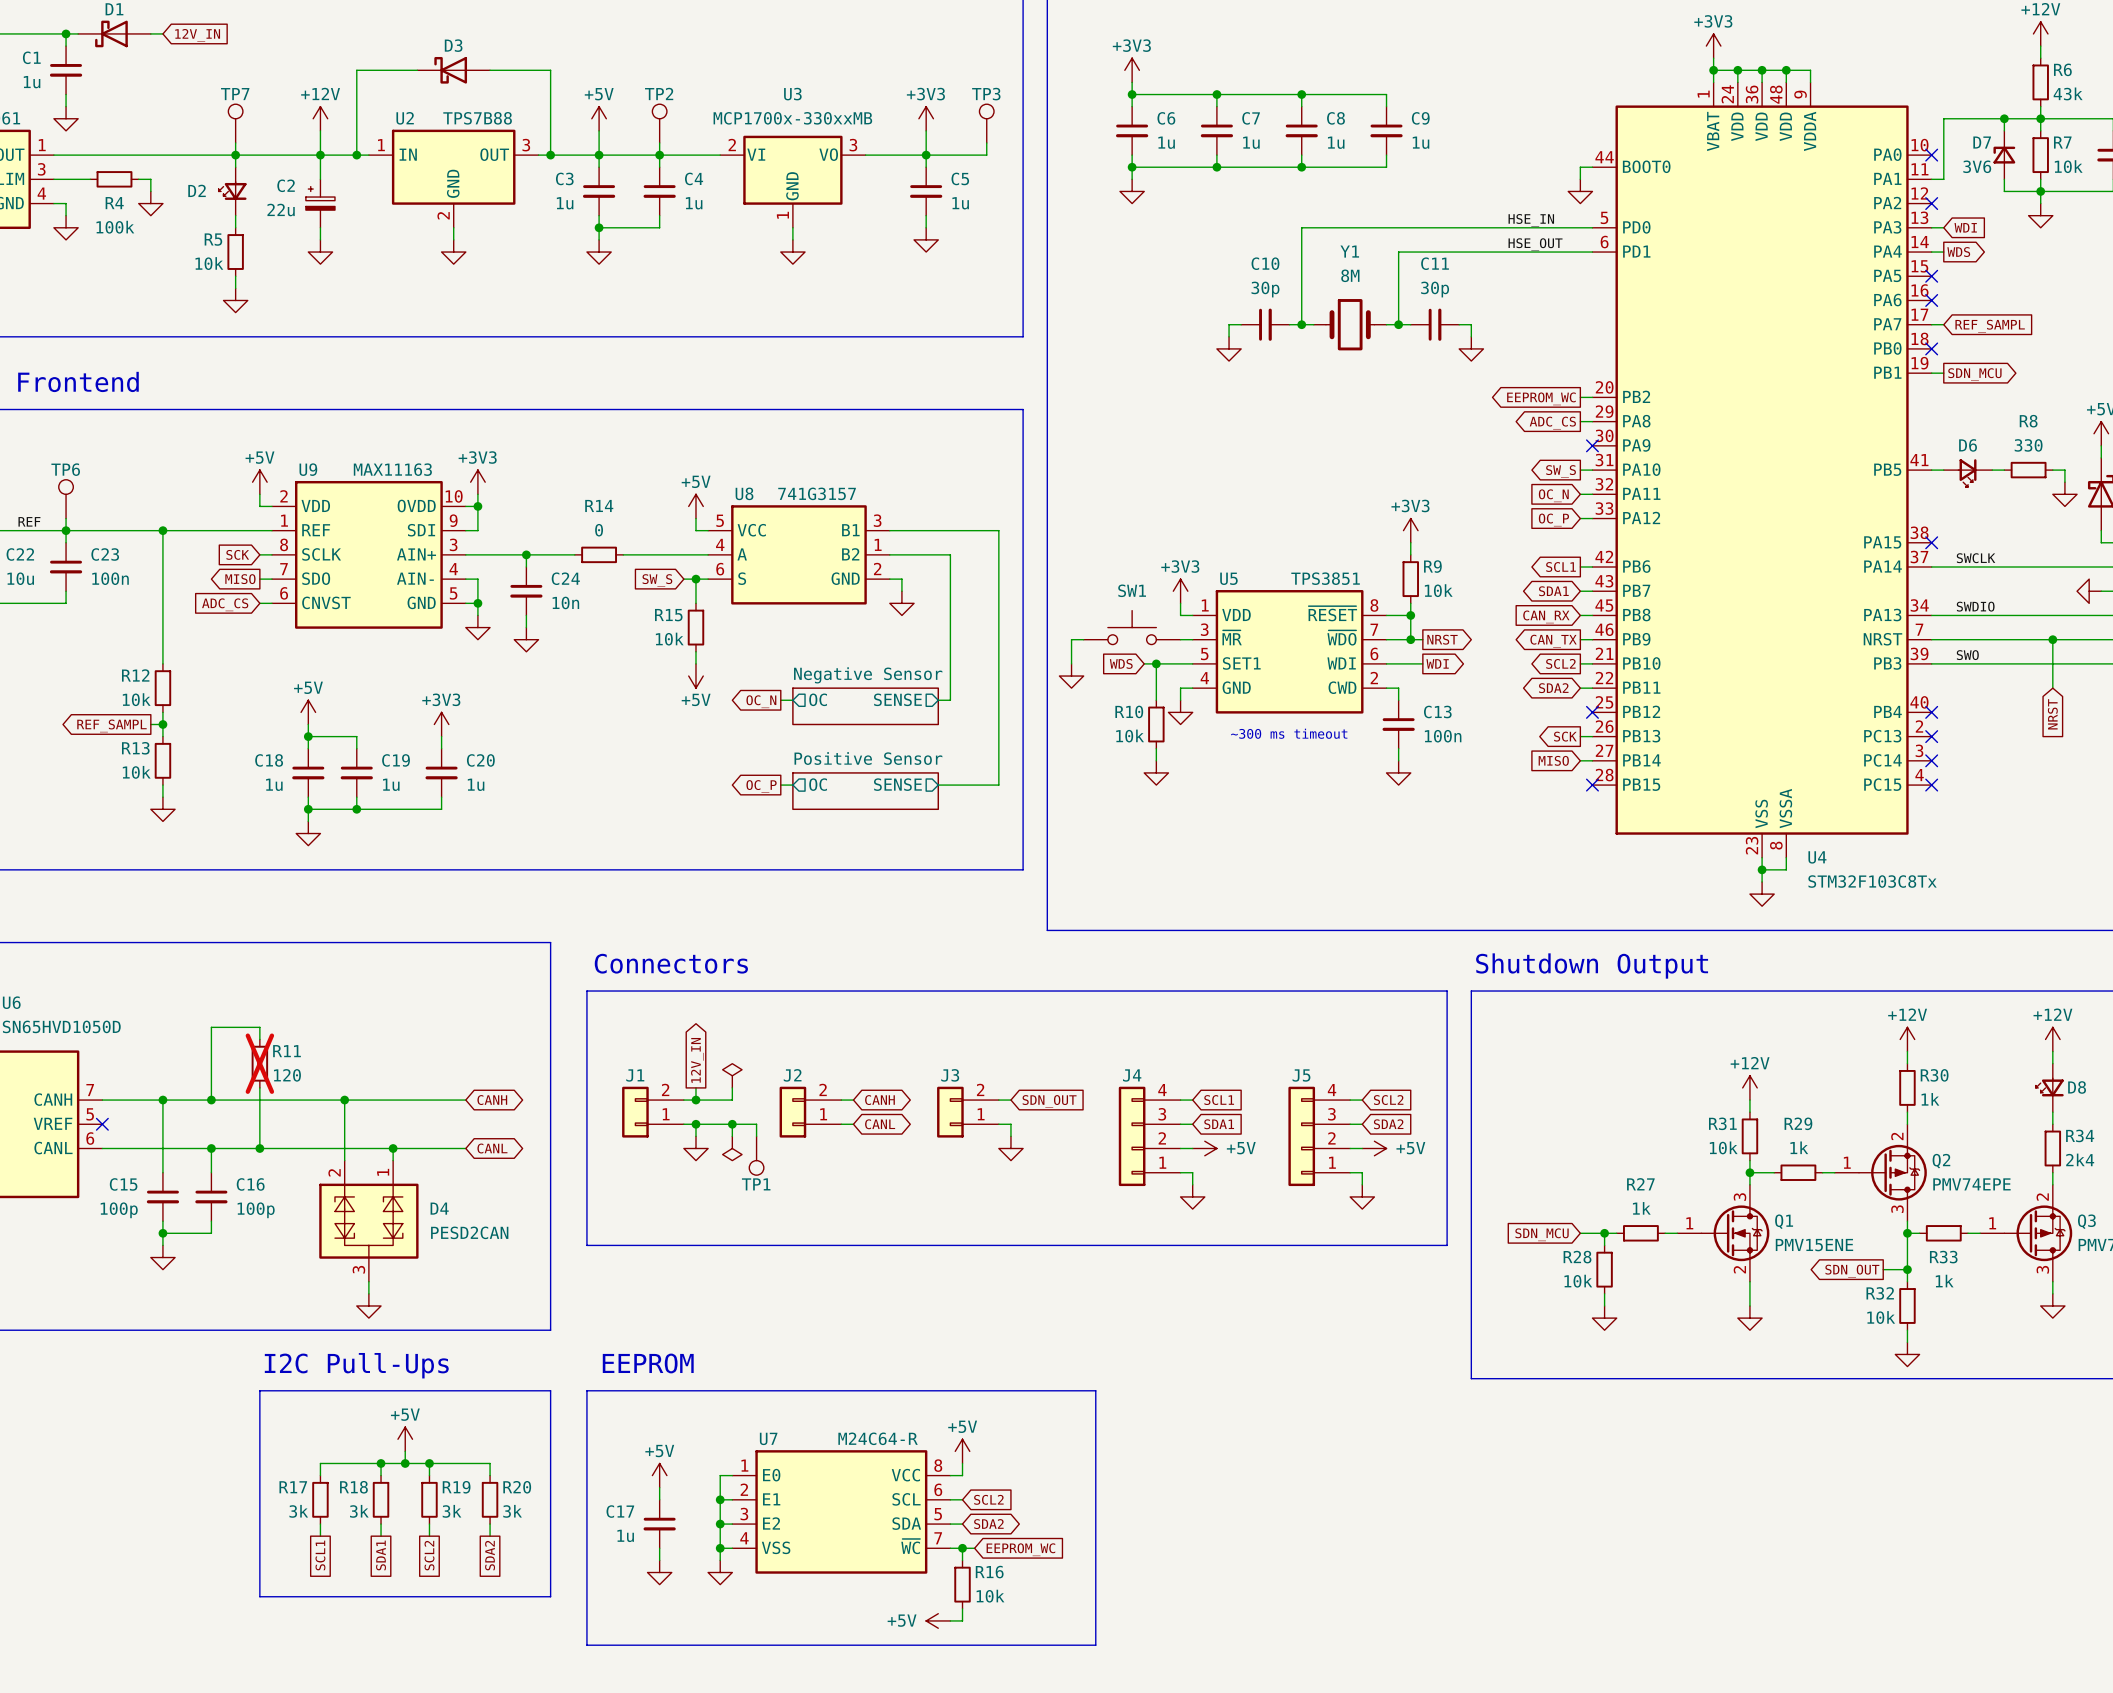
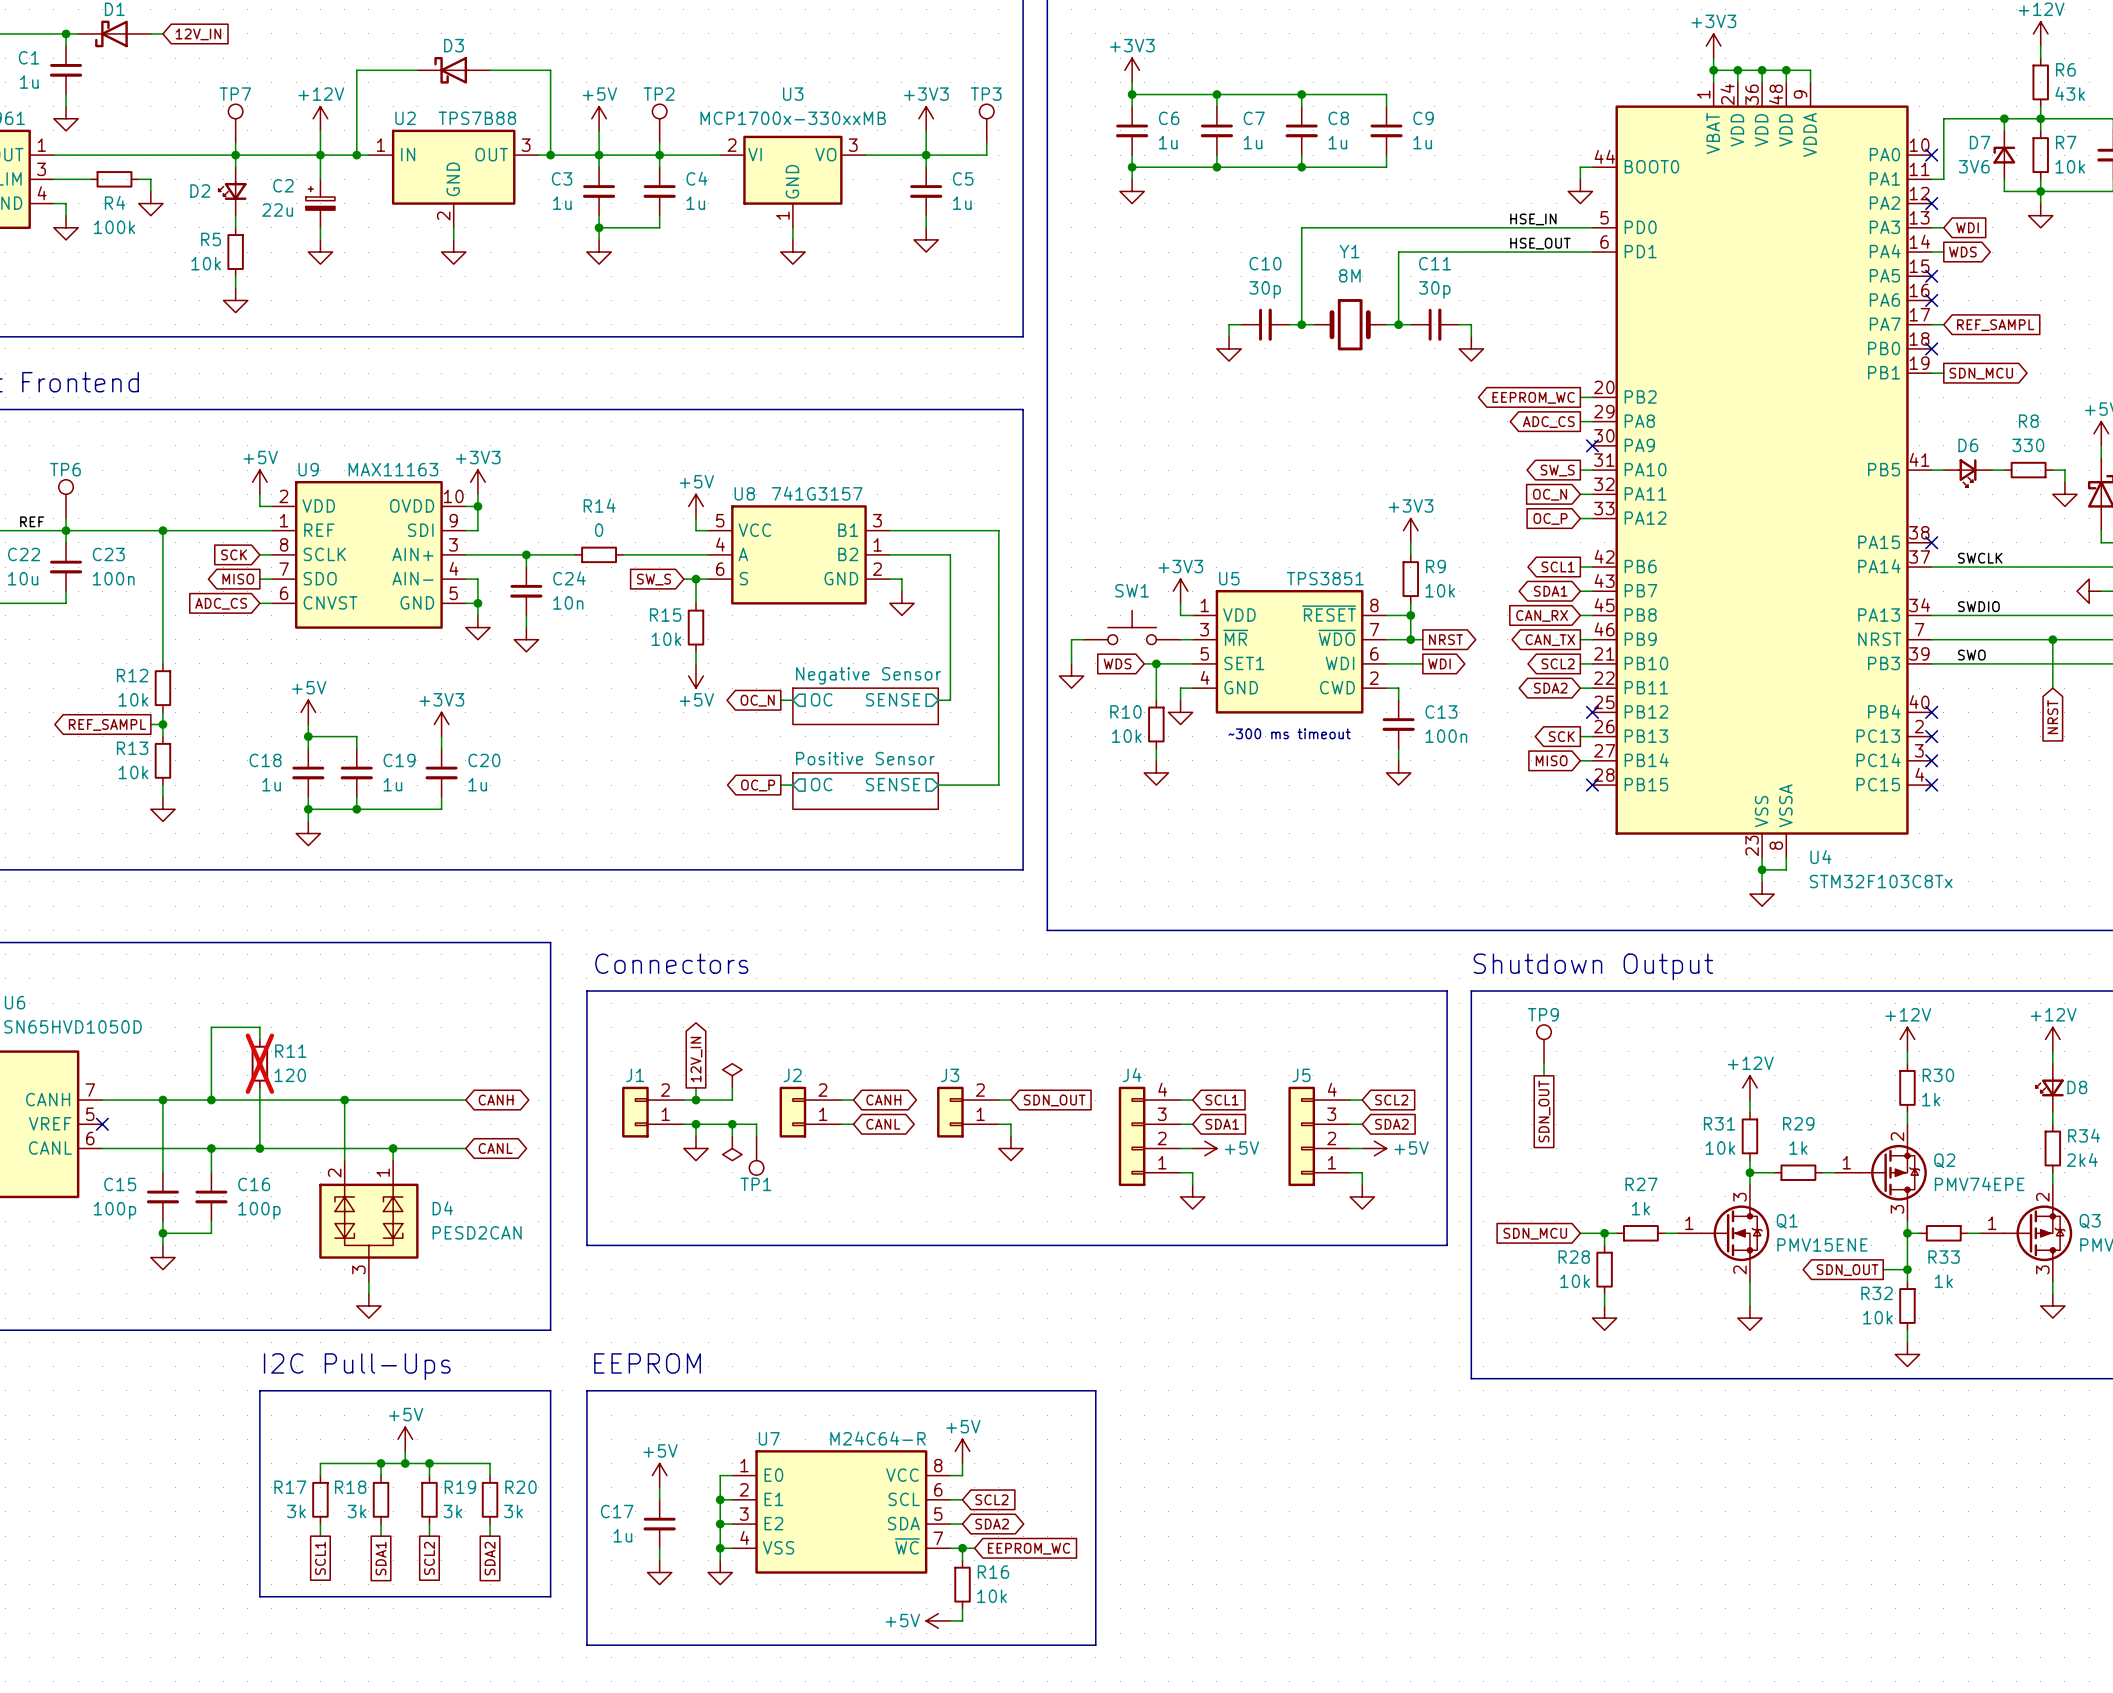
TP9: none -> (1544, 1044)
wire: none -> (1544, 1063) (1544, 1075)
global label: none -> SDN_OUT (1544, 1111)

